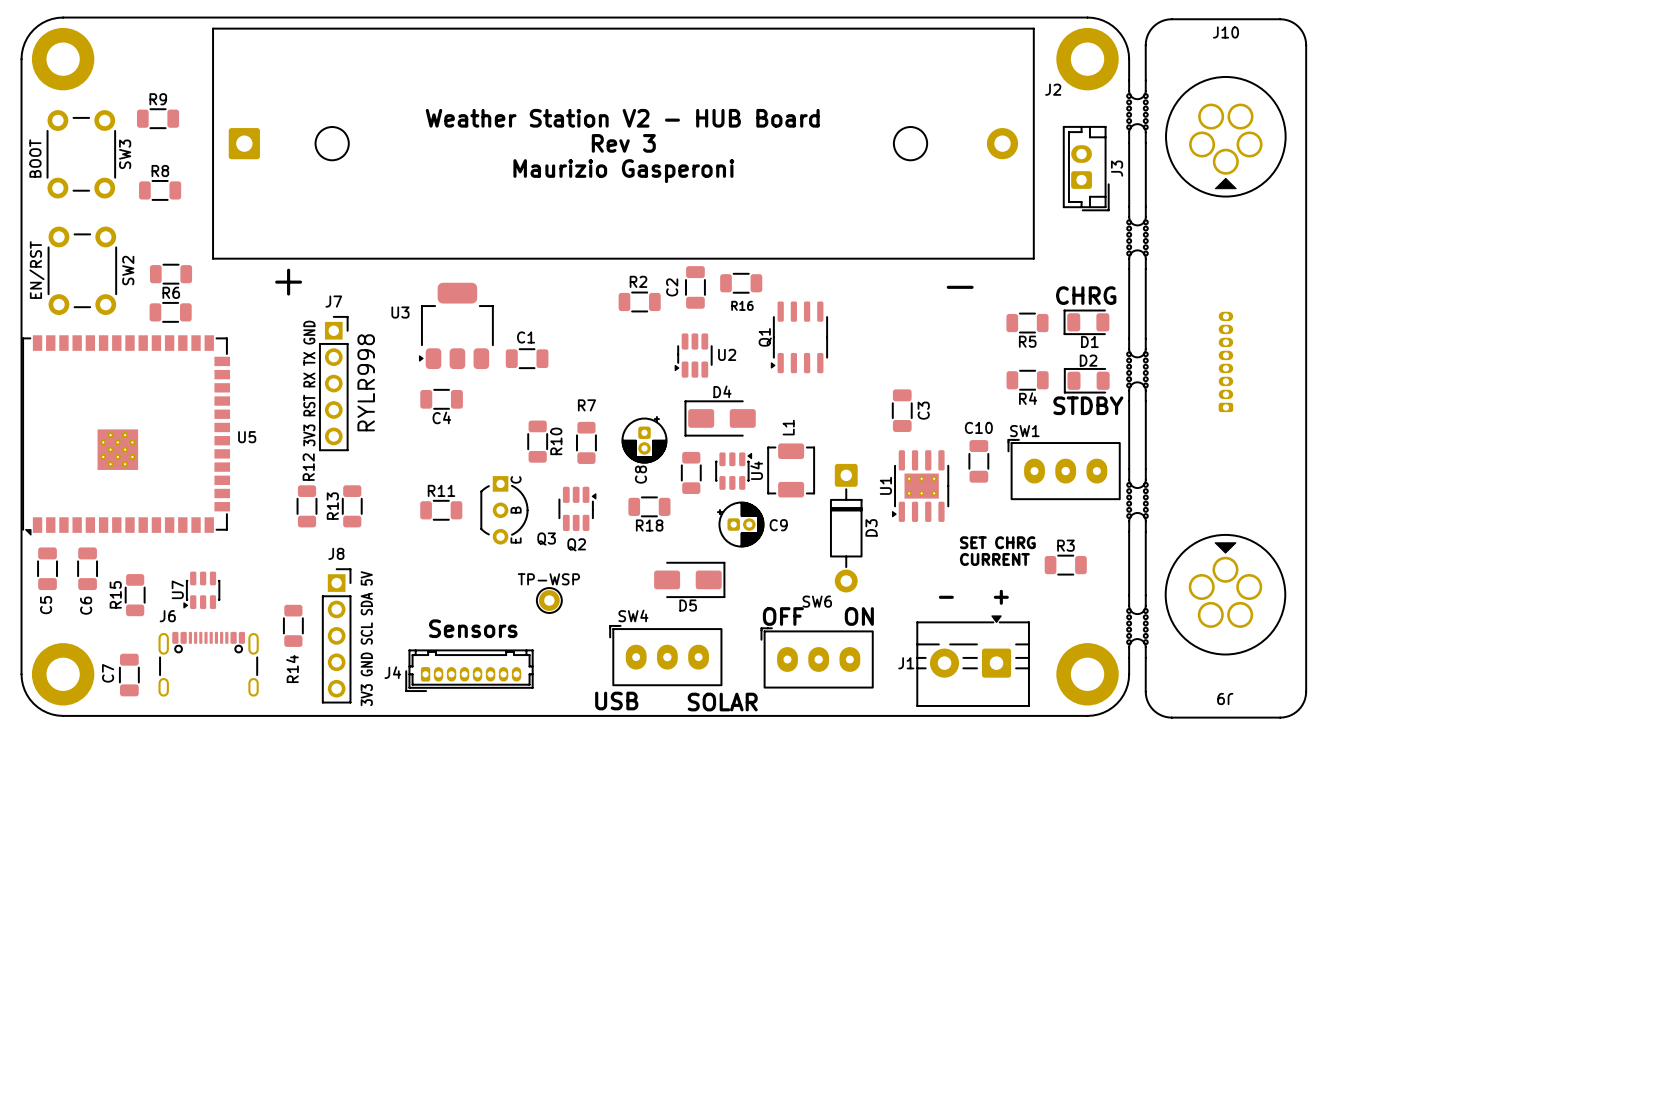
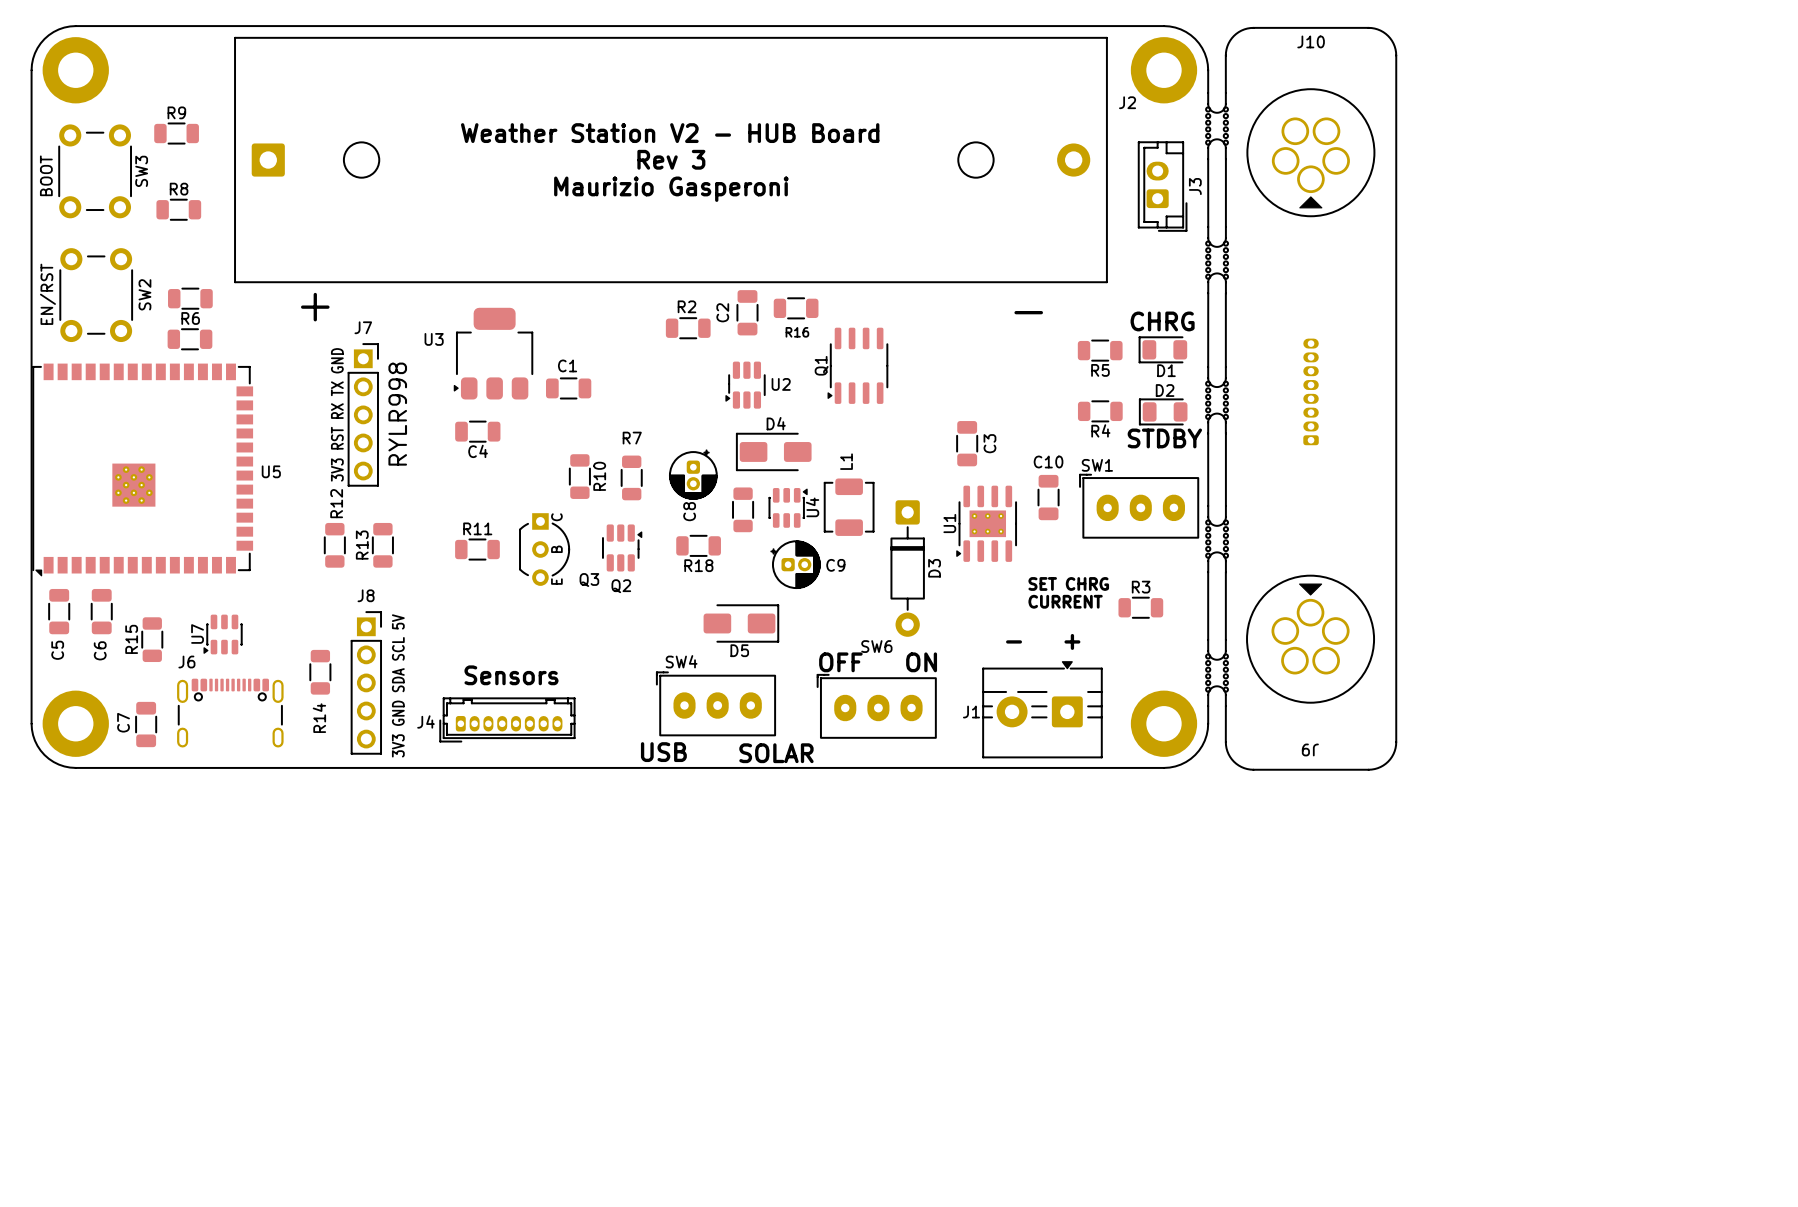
TP-WSP: (549, 600) -> none
text: 3V3 GND SCL SDA 5V (366, 638) -> 3V3 GND SDA SCL 5V (398, 685)

